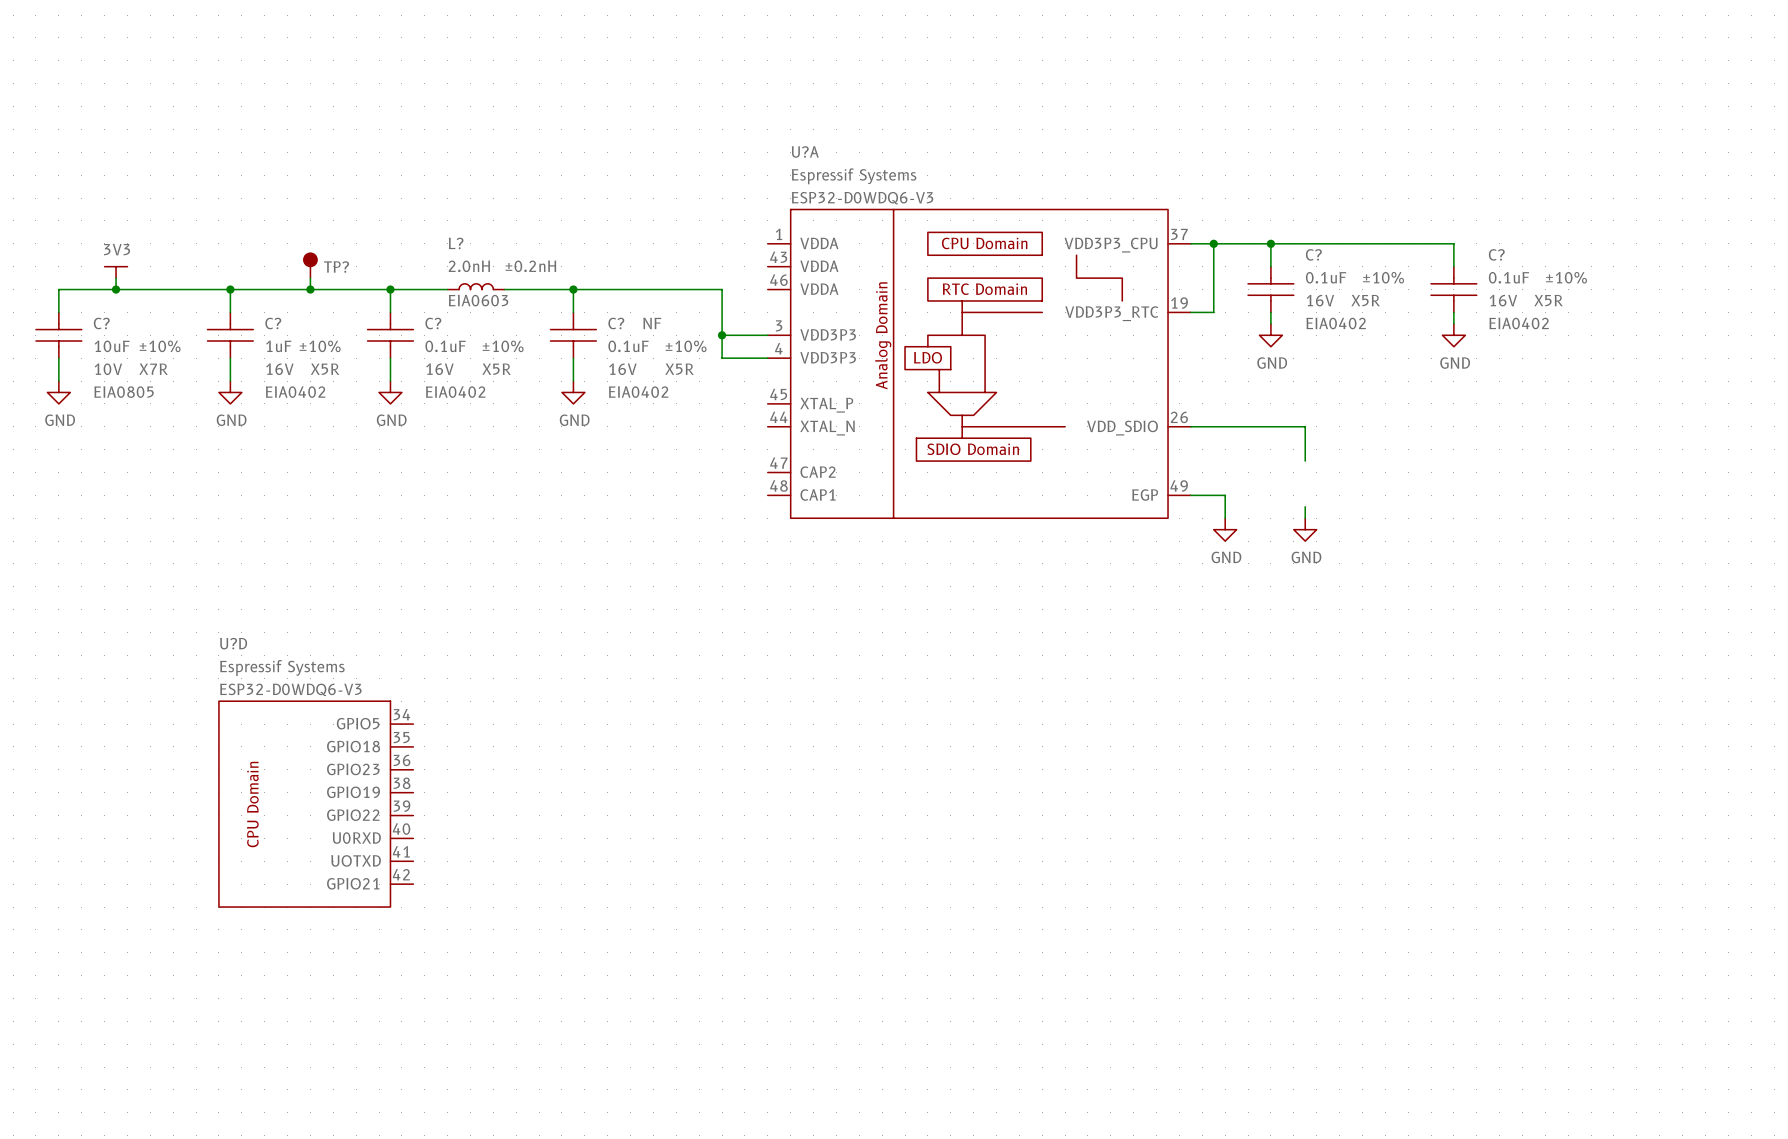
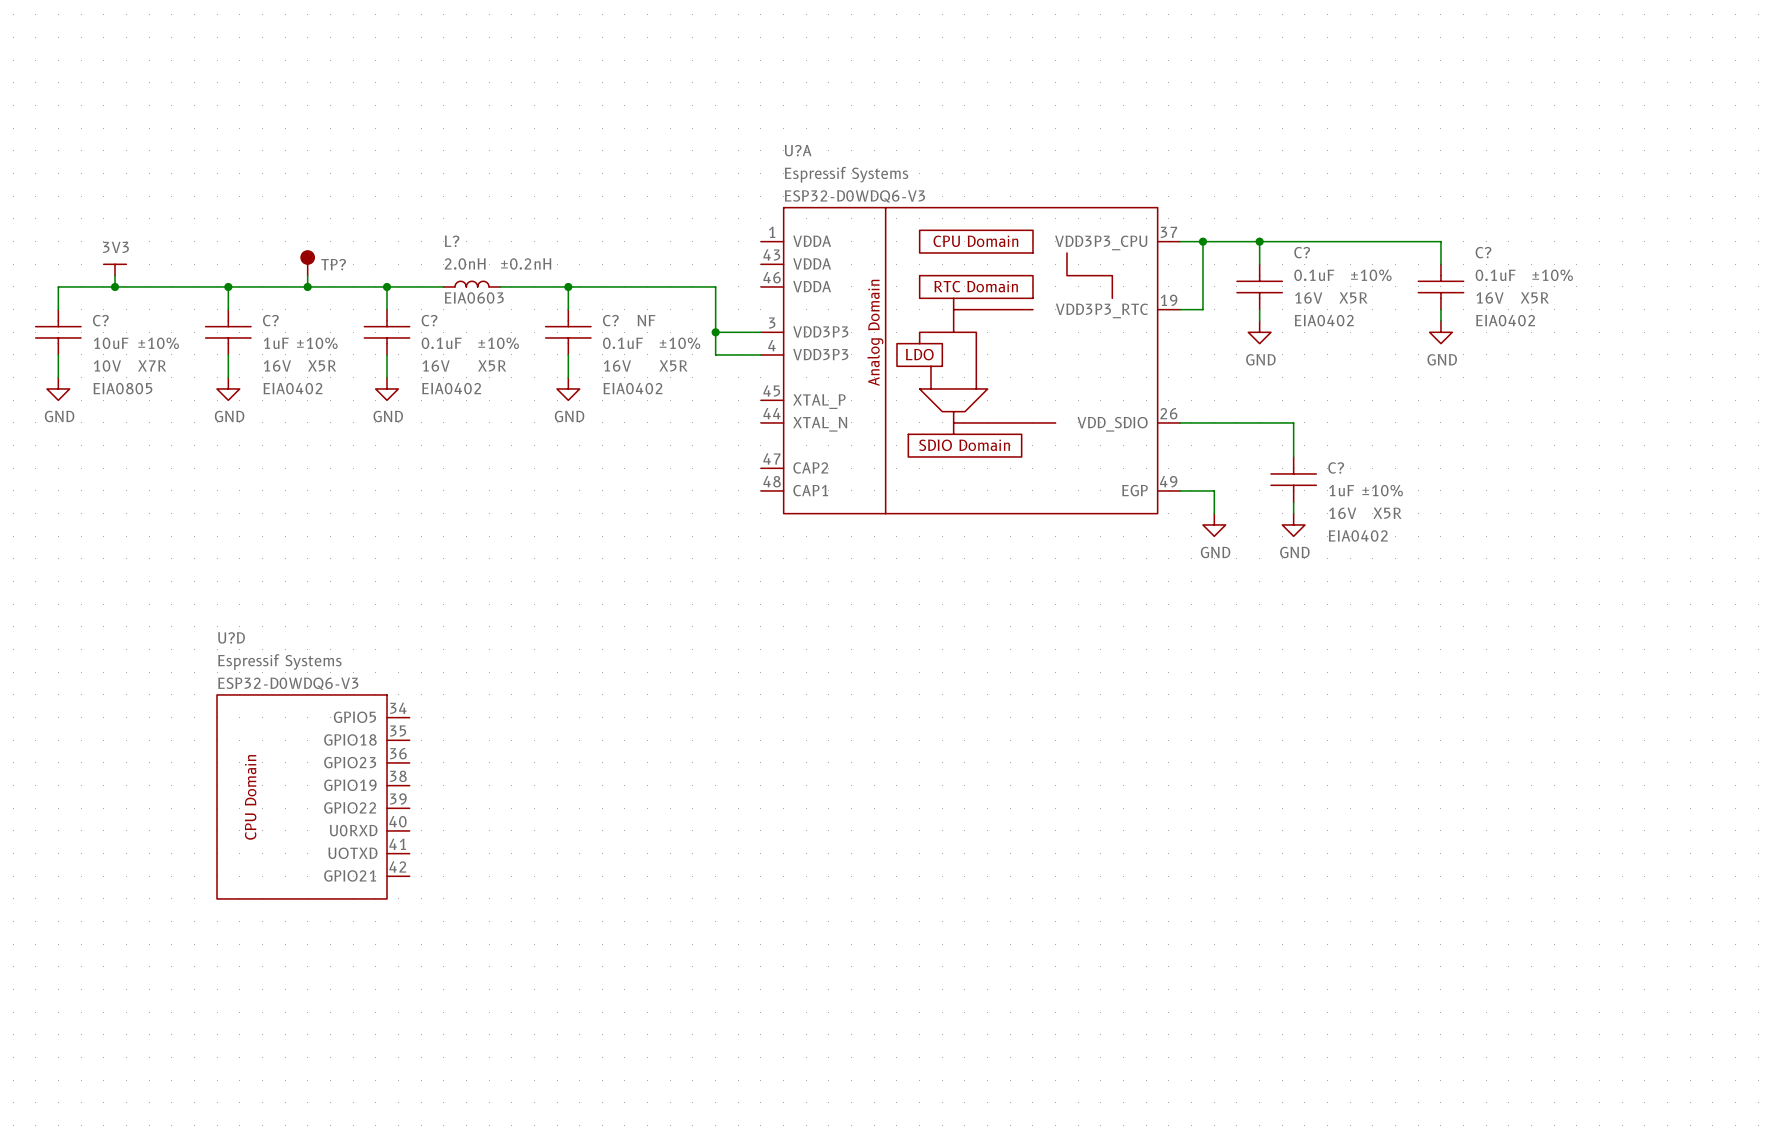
C?: none -> (1293, 479)

